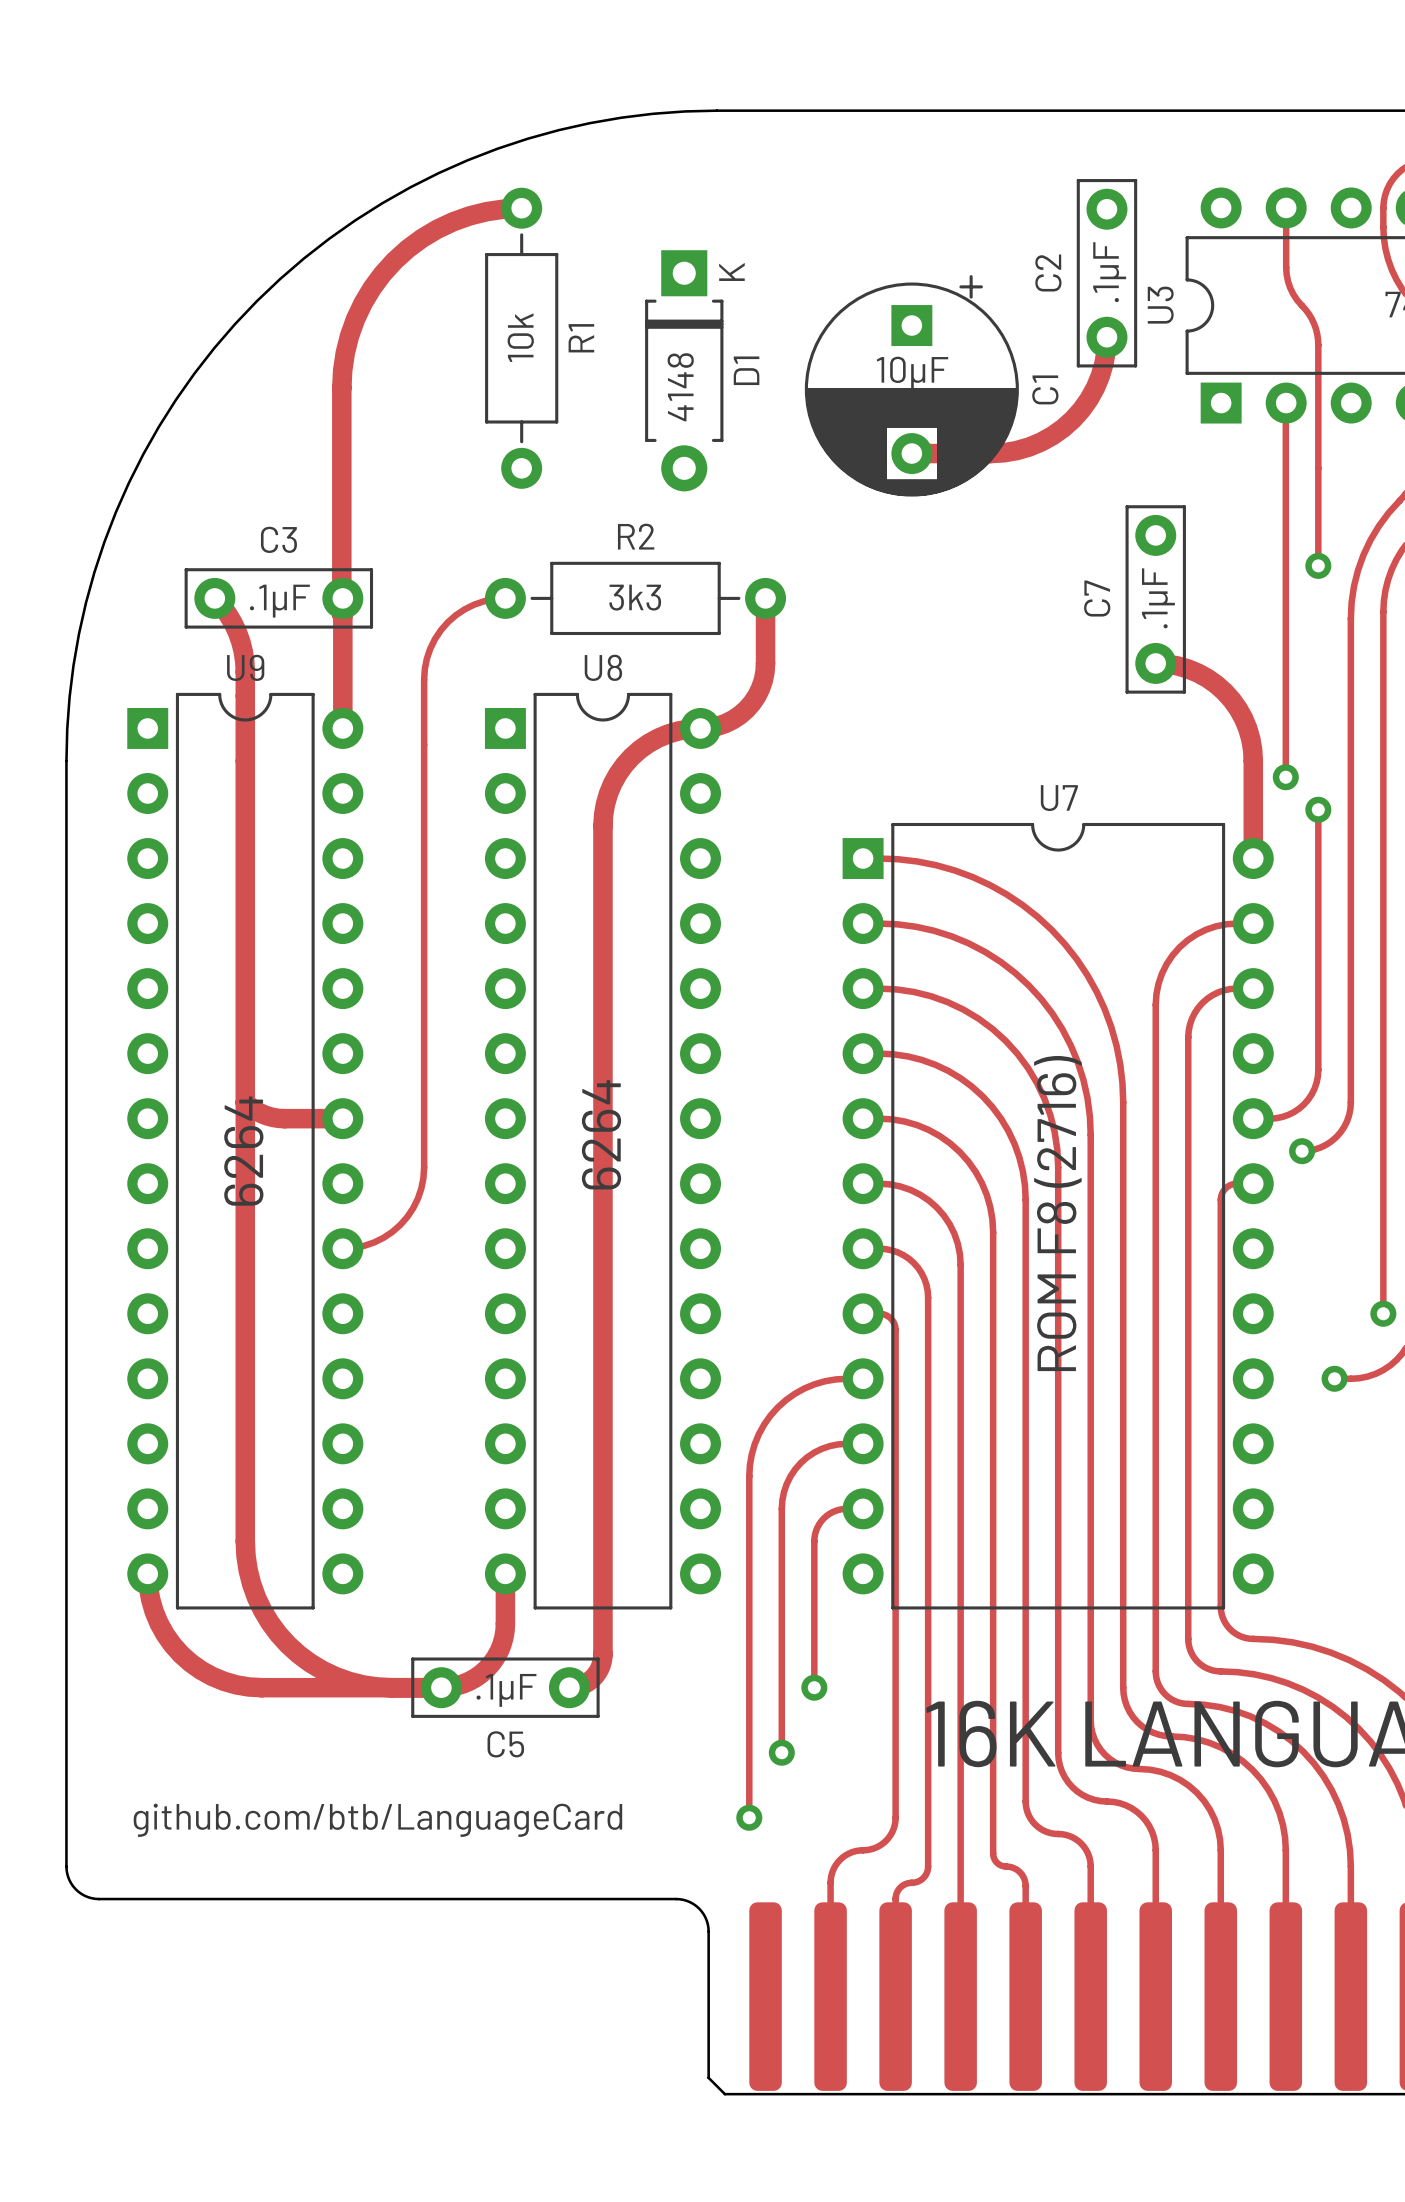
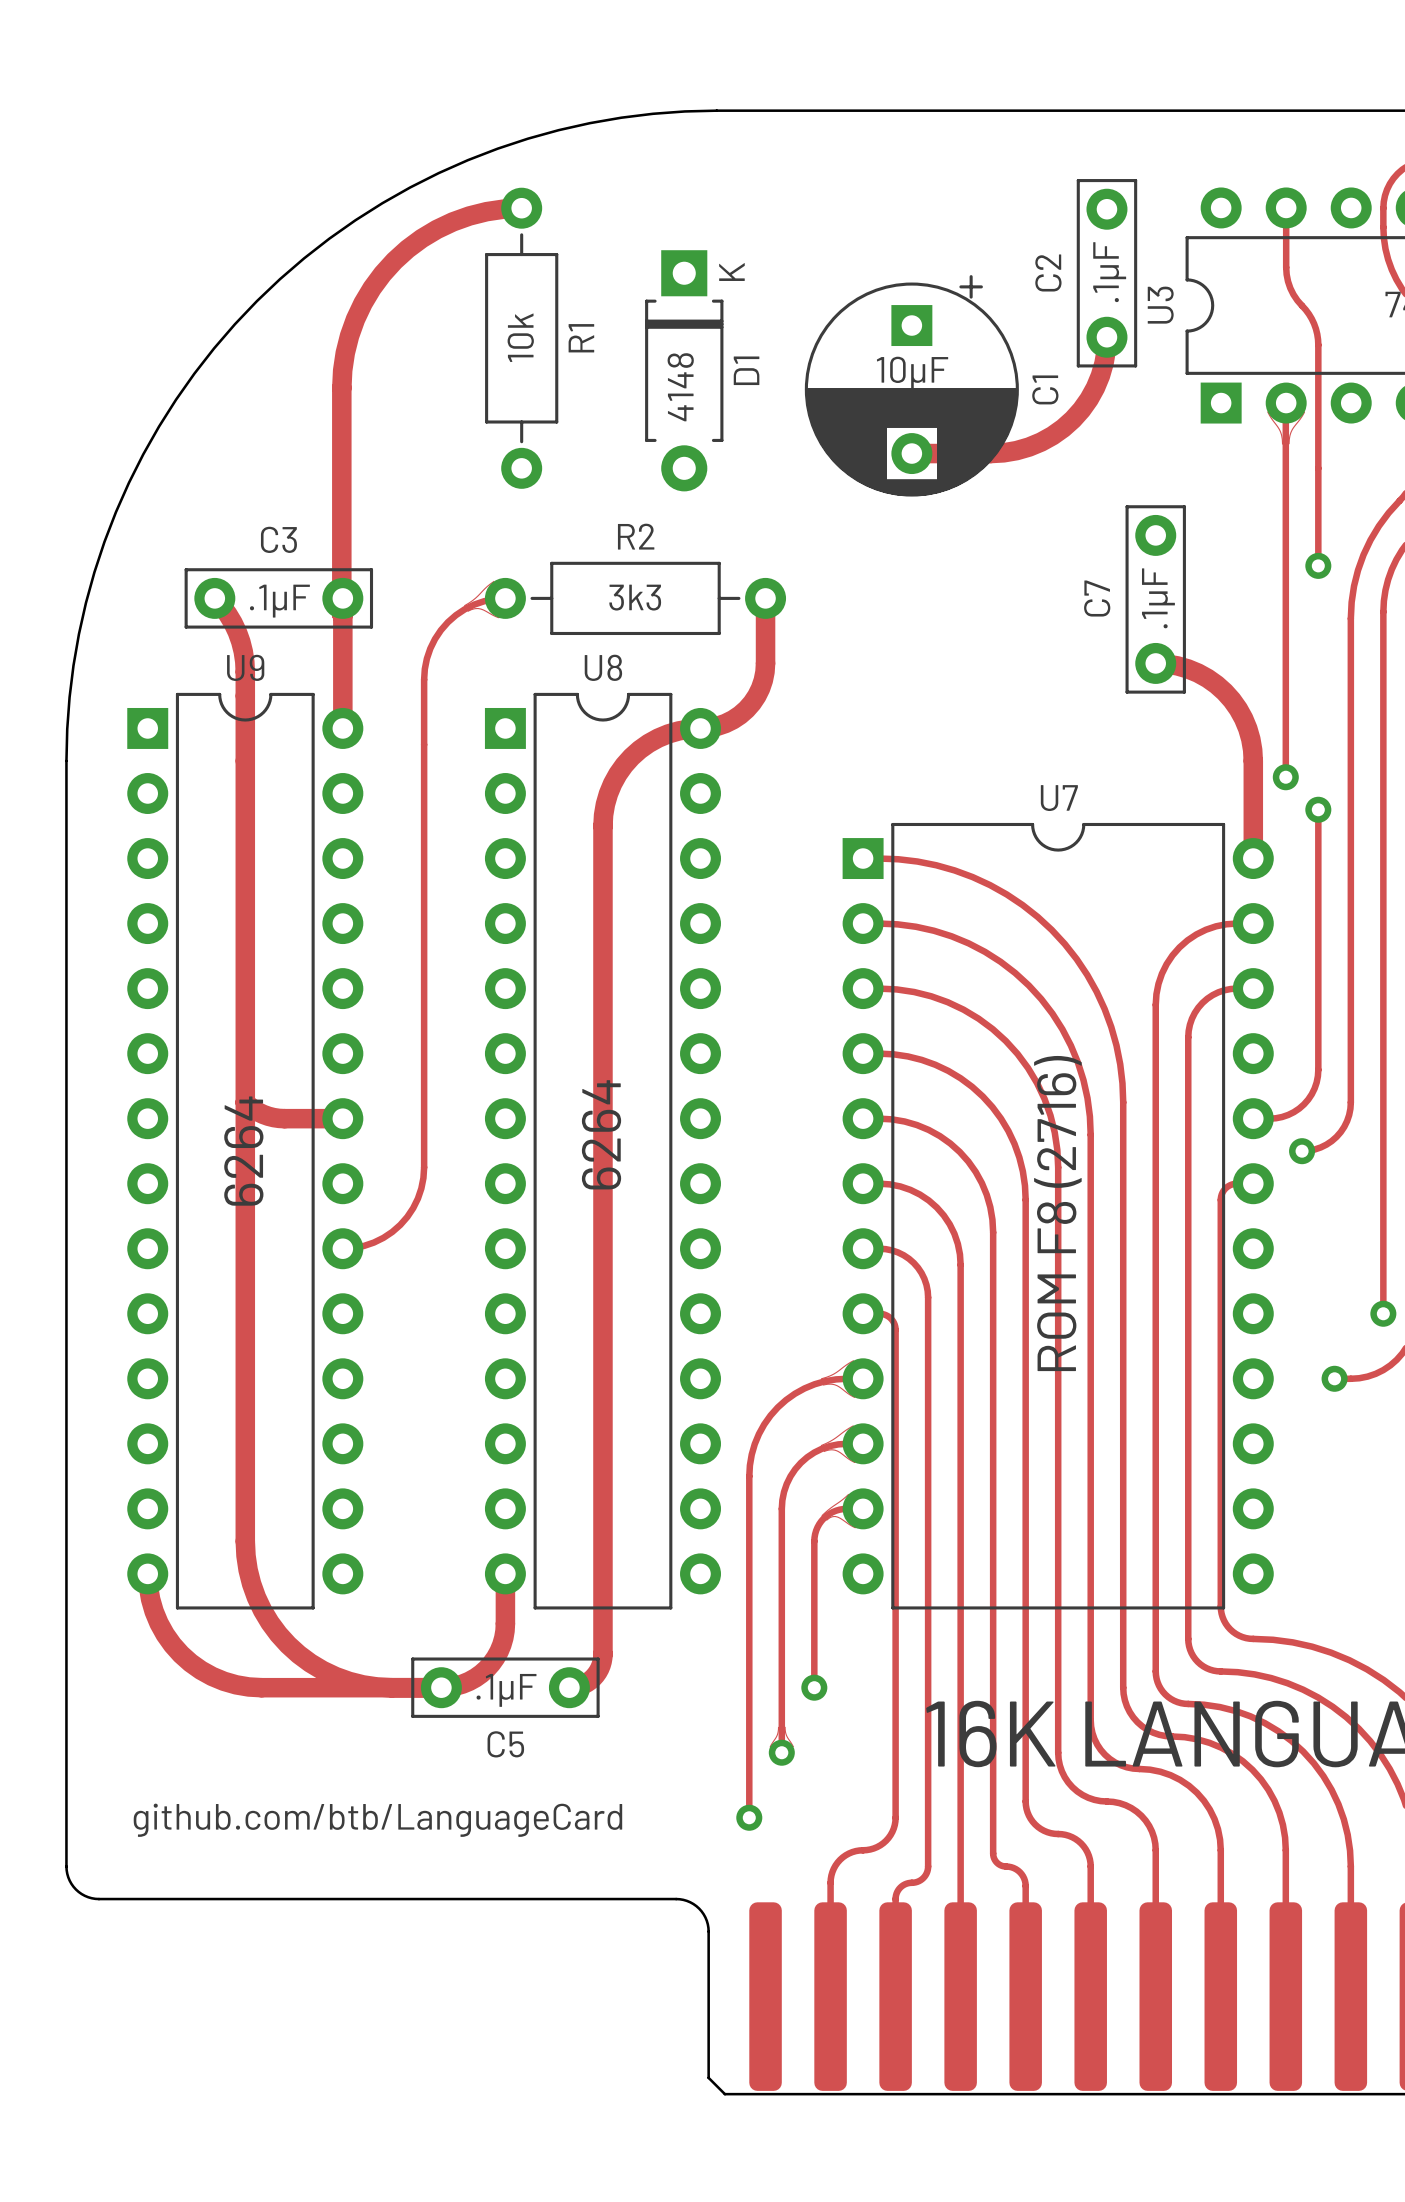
zone outline: none -> (1286, 392) (1304, 412) (1291, 432) (1289, 444) (1282, 444) (1280, 431) (1267, 411) (1286, 392)
zone outline: none -> (494, 581) (515, 597) (498, 617) (480, 609) (467, 611) (464, 605) (494, 581)
zone outline: none -> (853, 1360) (873, 1378) (854, 1397) (834, 1384) (823, 1385) (821, 1378) (833, 1374) (853, 1360)
zone outline: none -> (853, 1425) (873, 1443) (854, 1462) (837, 1451) (831, 1449) (823, 1451) (821, 1445) (853, 1425)
zone outline: none -> (848, 1494) (873, 1508) (855, 1527) (837, 1517) (832, 1516) (826, 1520) (821, 1515) (848, 1494)
zone outline: none -> (778, 1726) (776, 1736) (770, 1747) (781, 1759) (793, 1747) (786, 1736) (785, 1726) (778, 1726)

